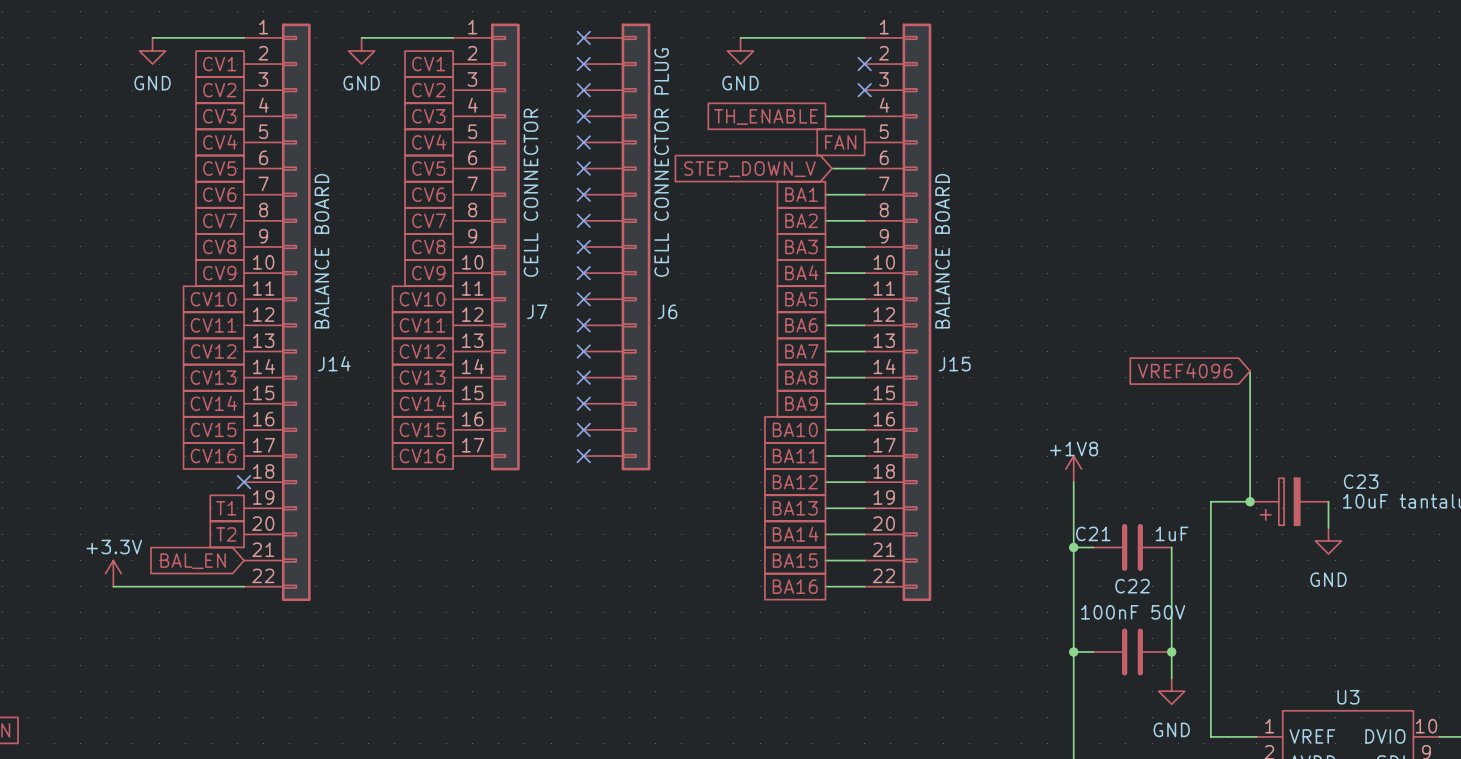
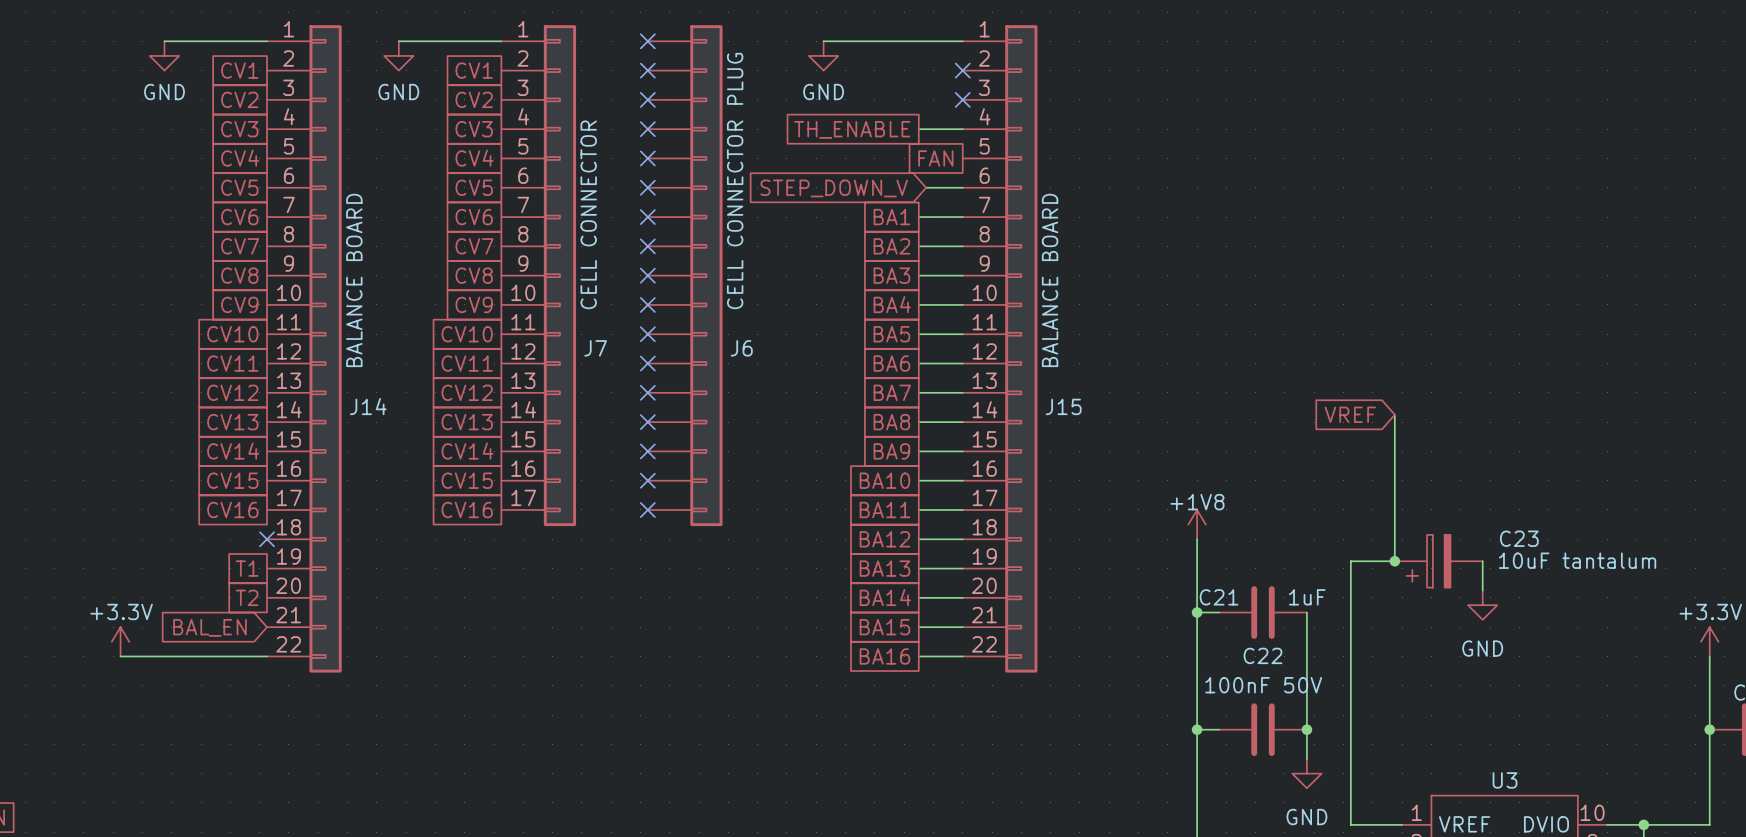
global label: VREF4096 (1185, 370) -> VREF (1350, 414)

